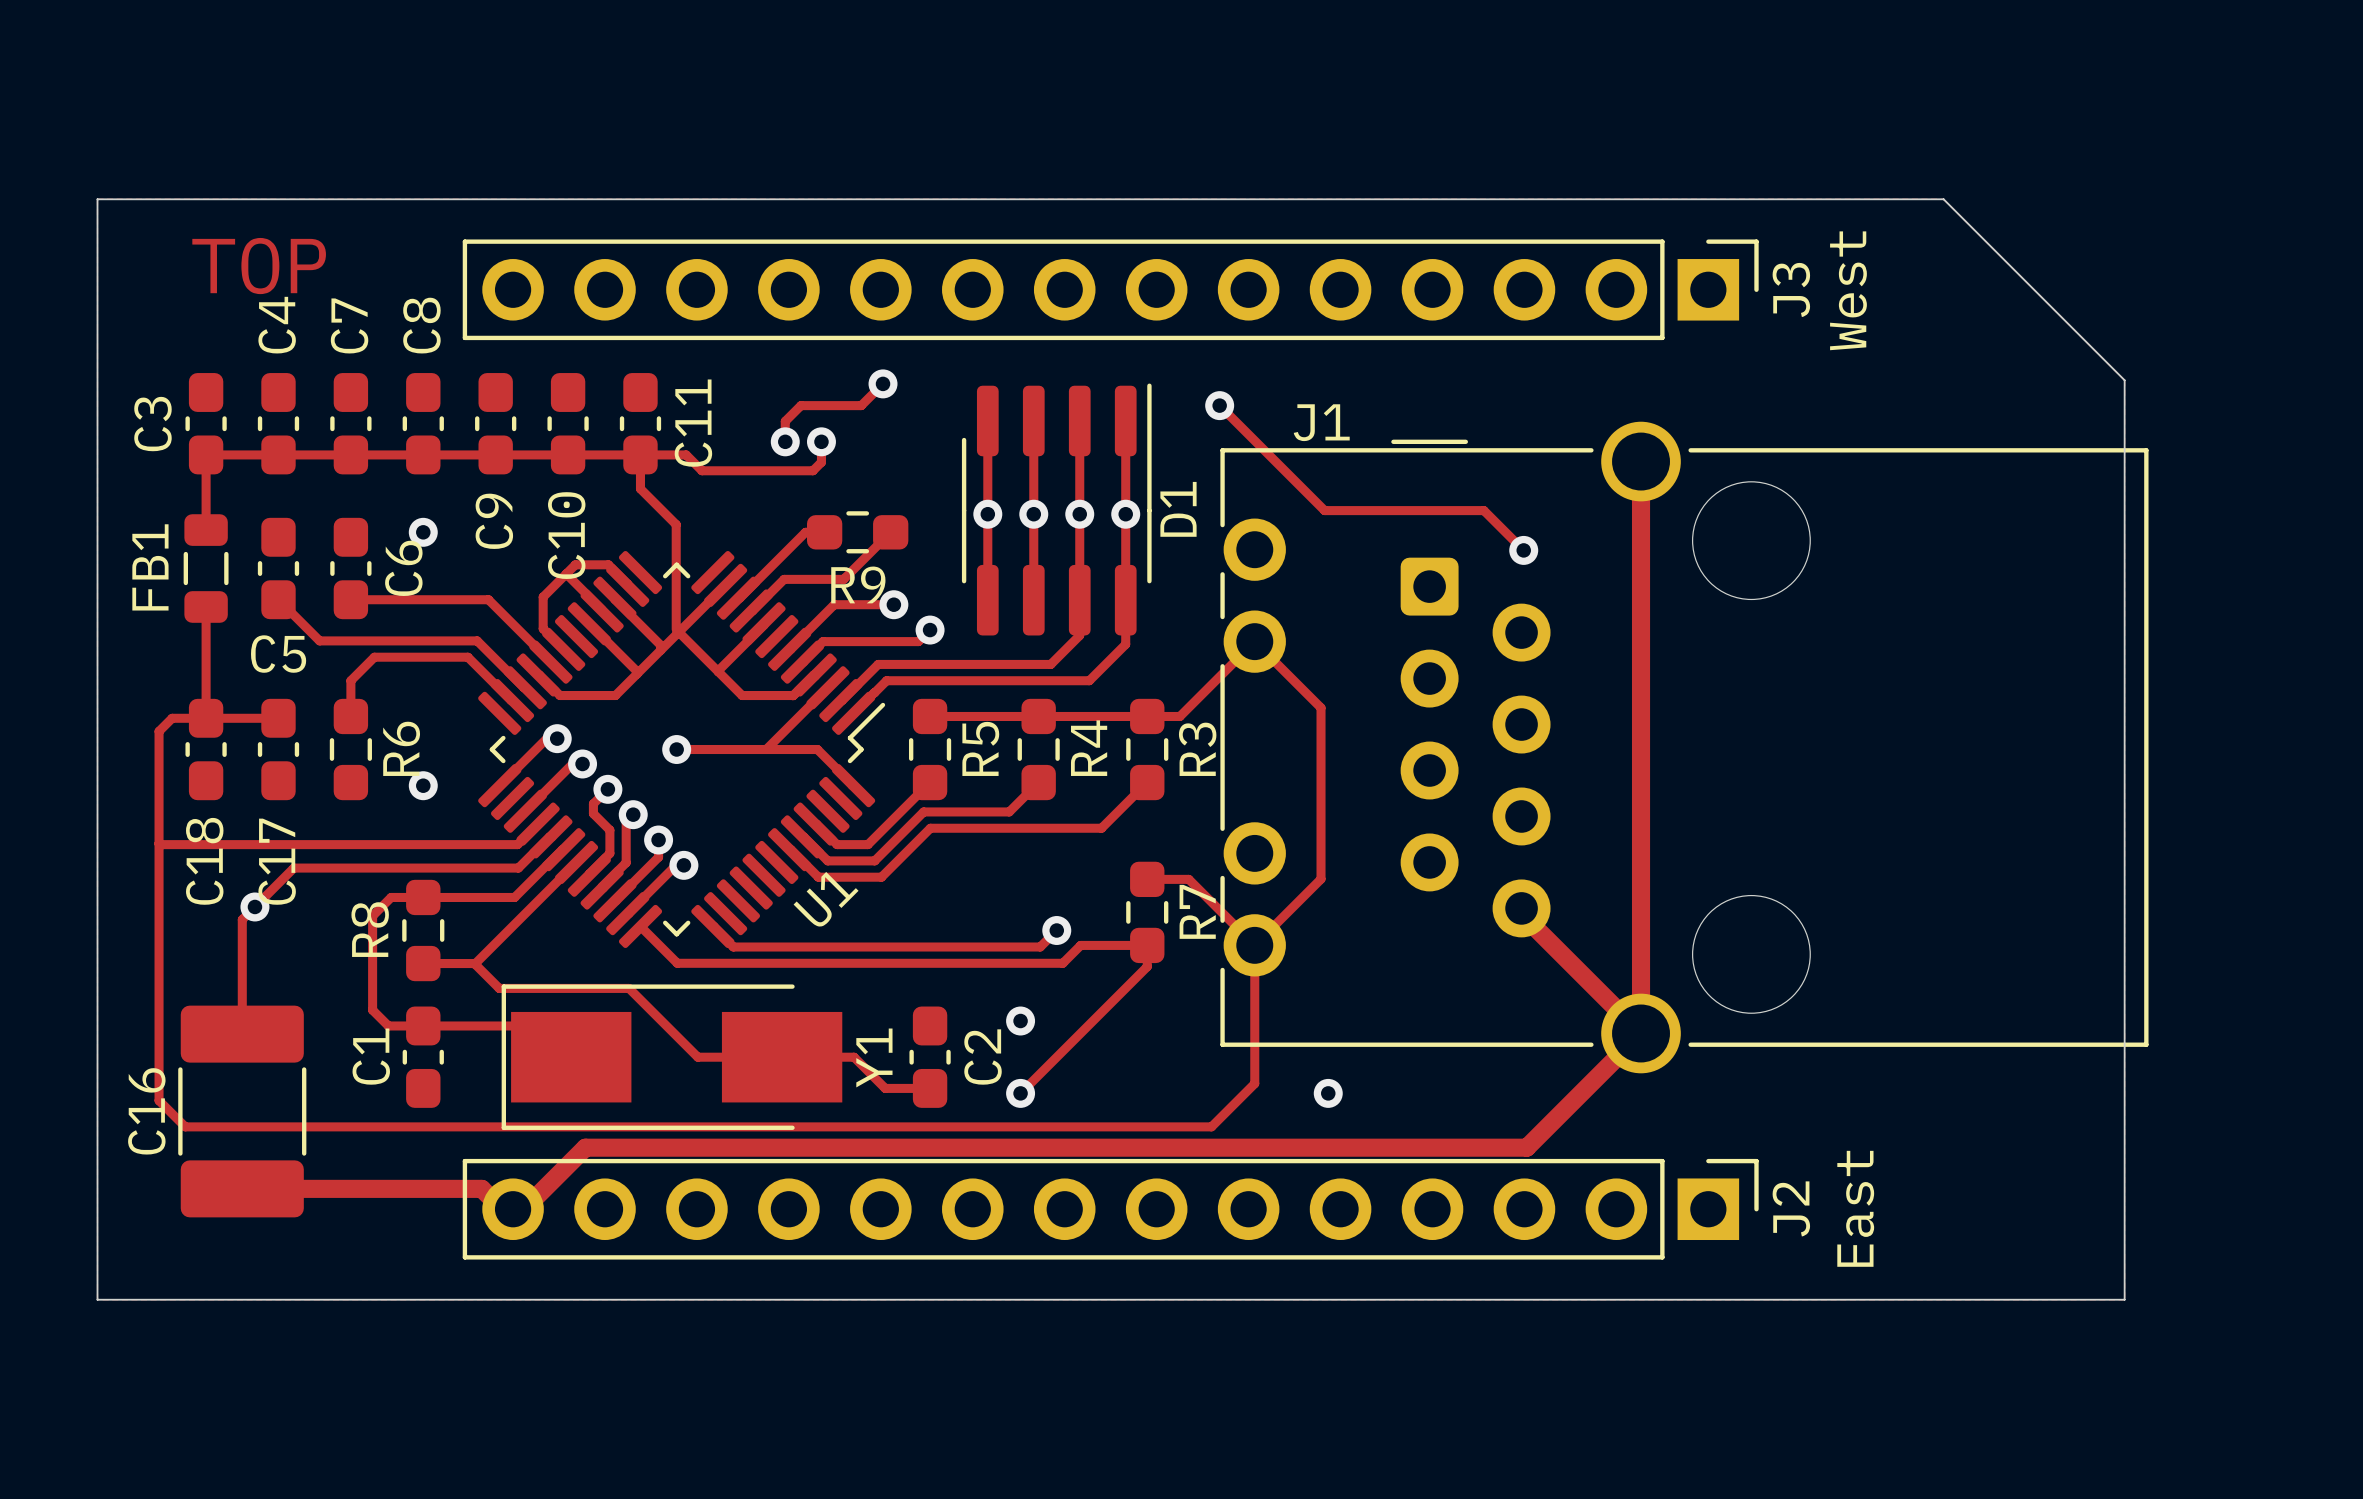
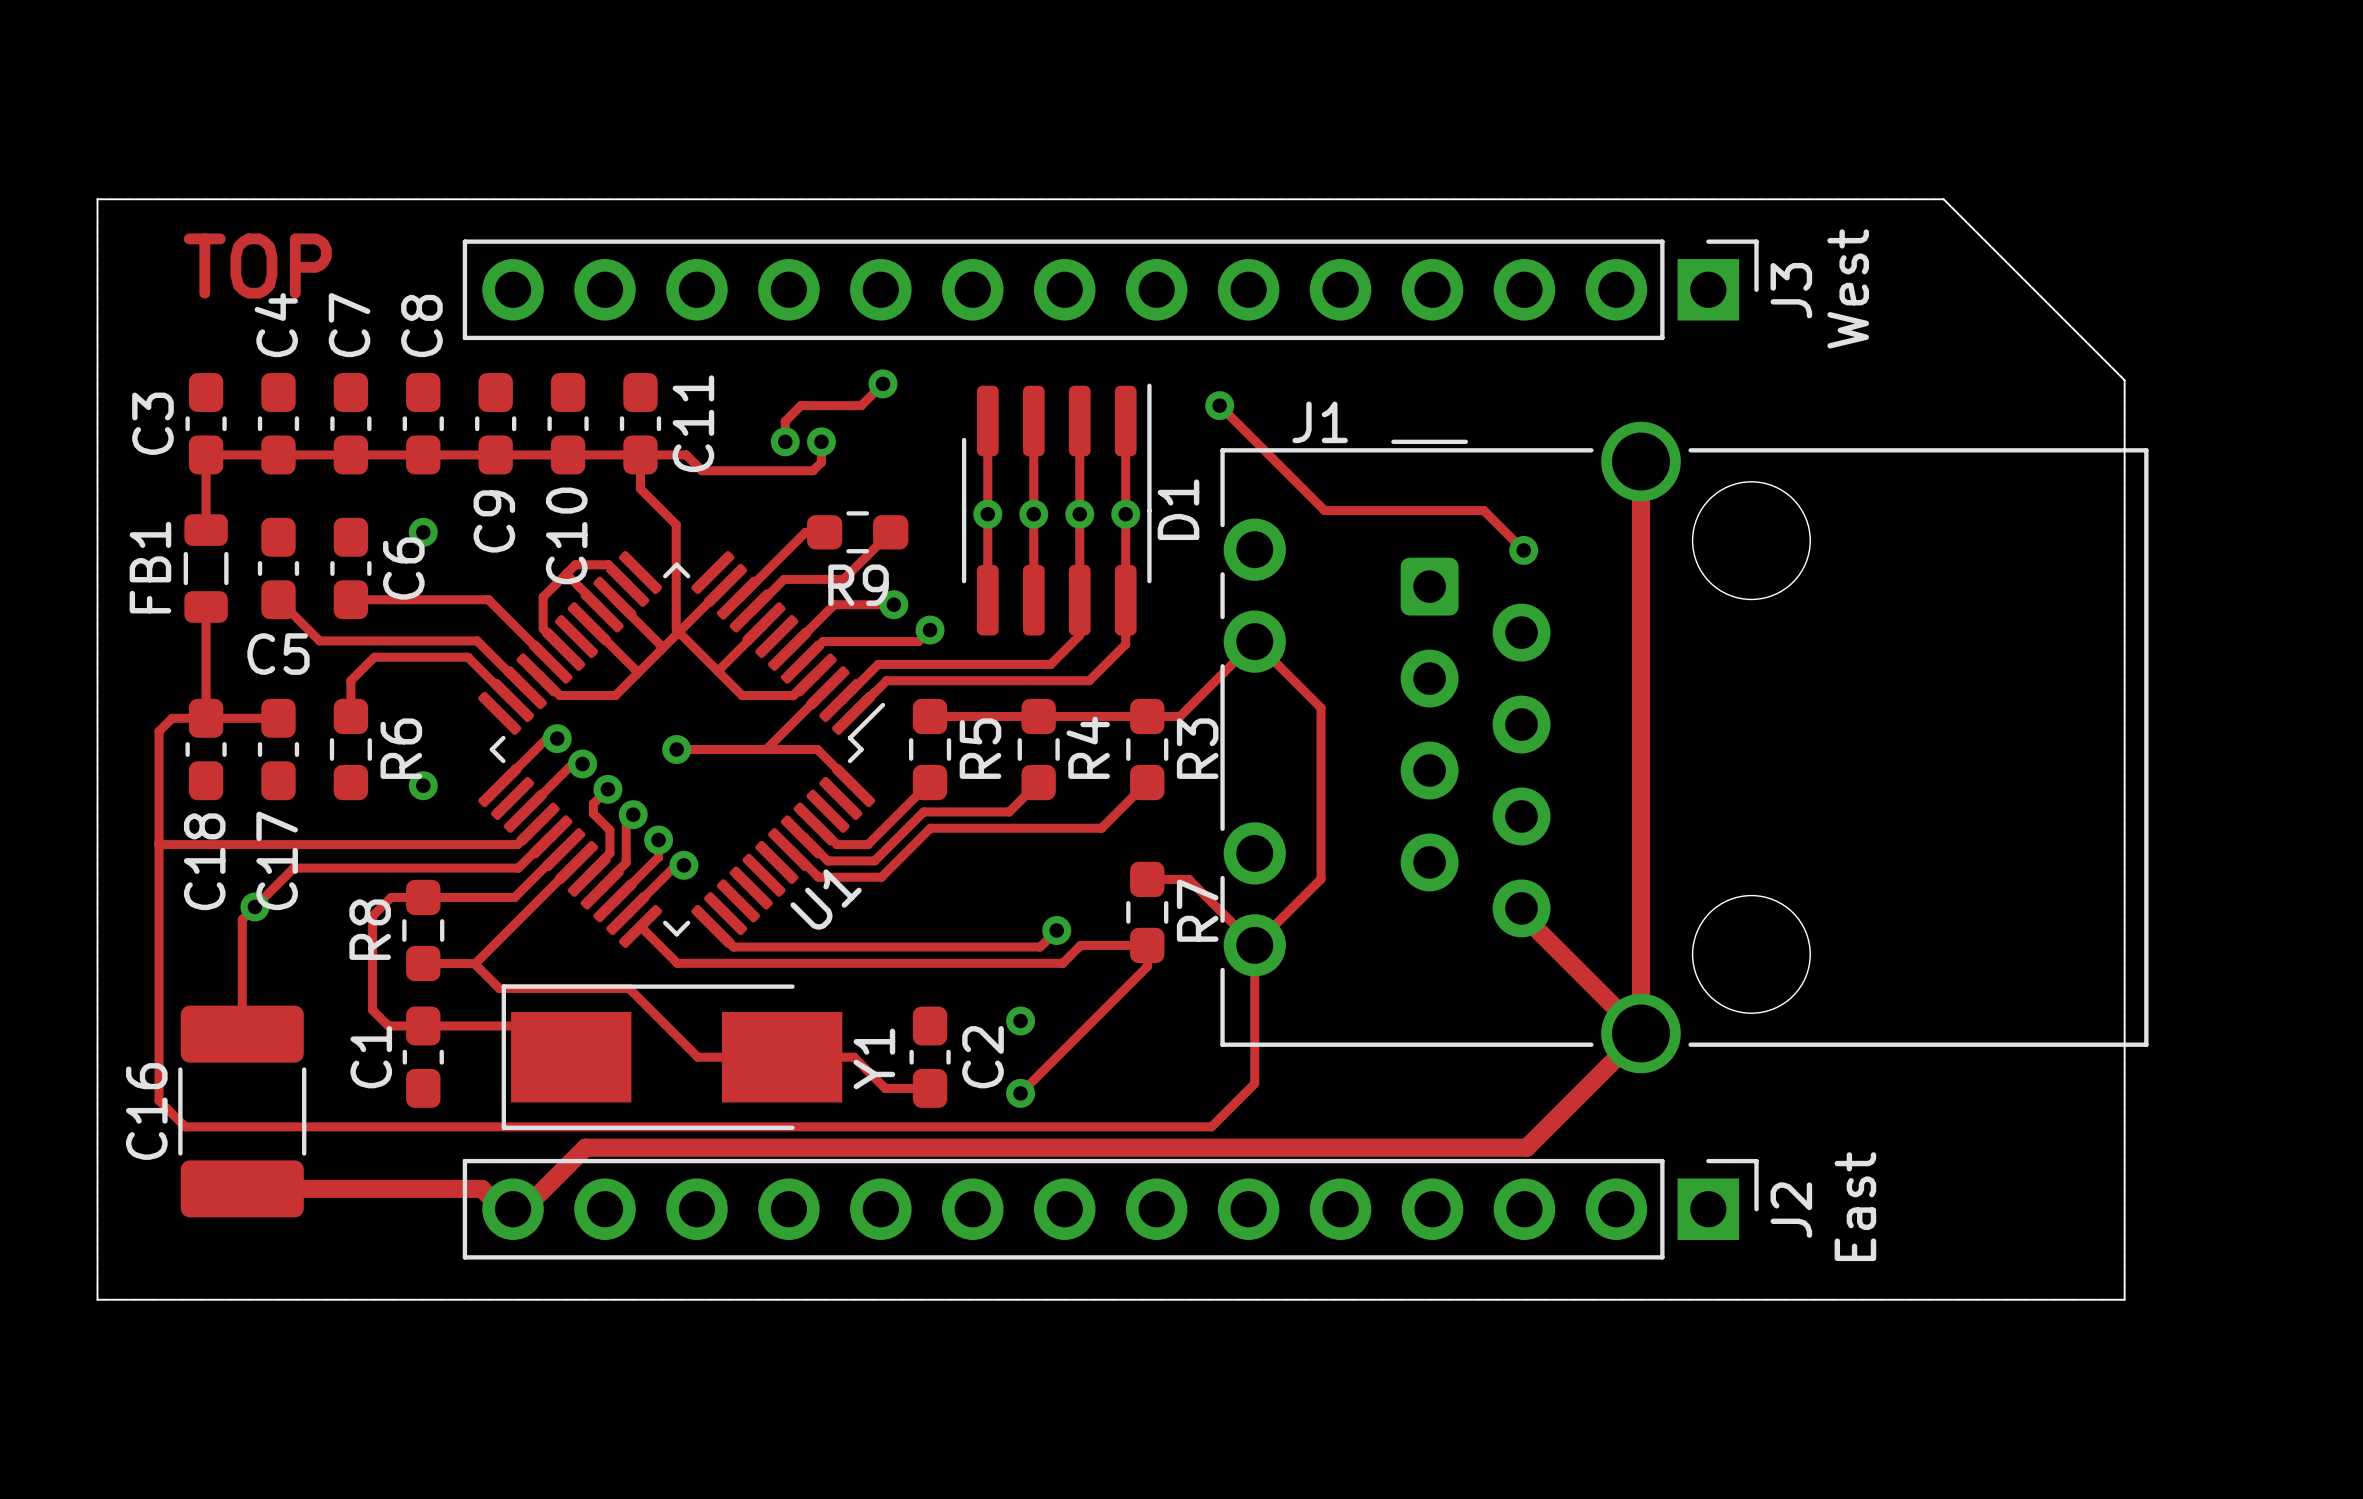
via: (1328, 1093) -> none

